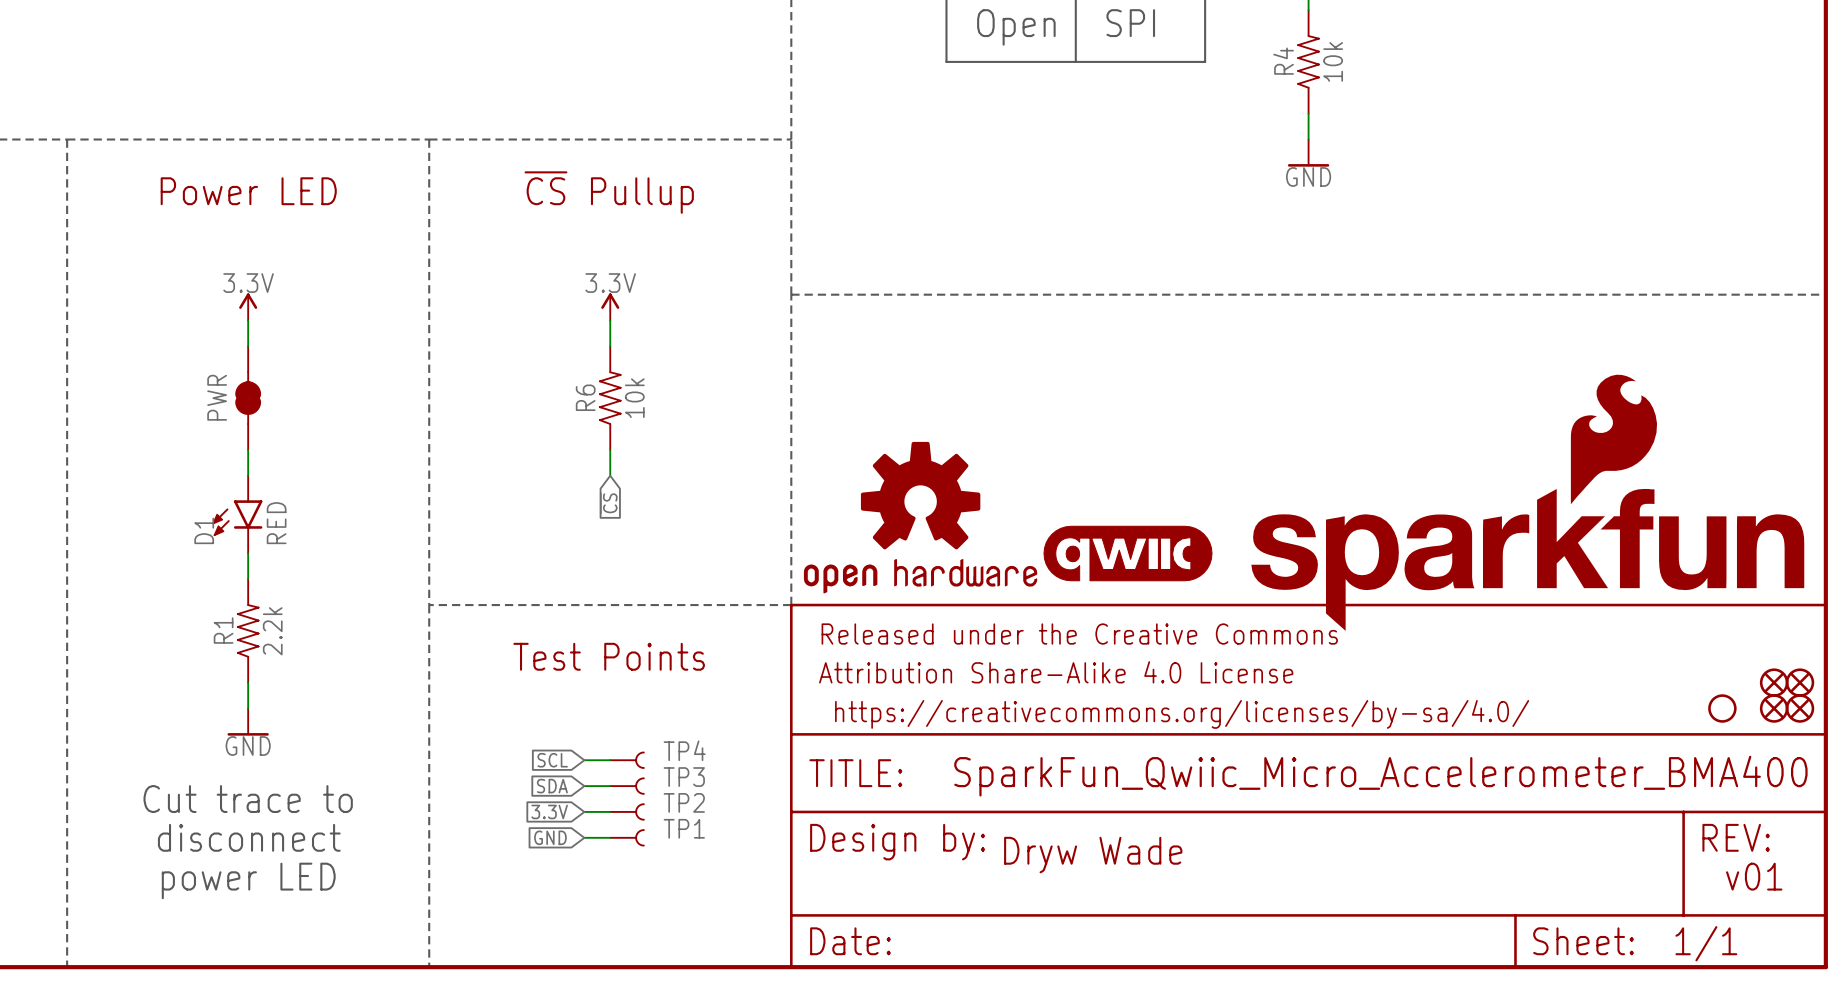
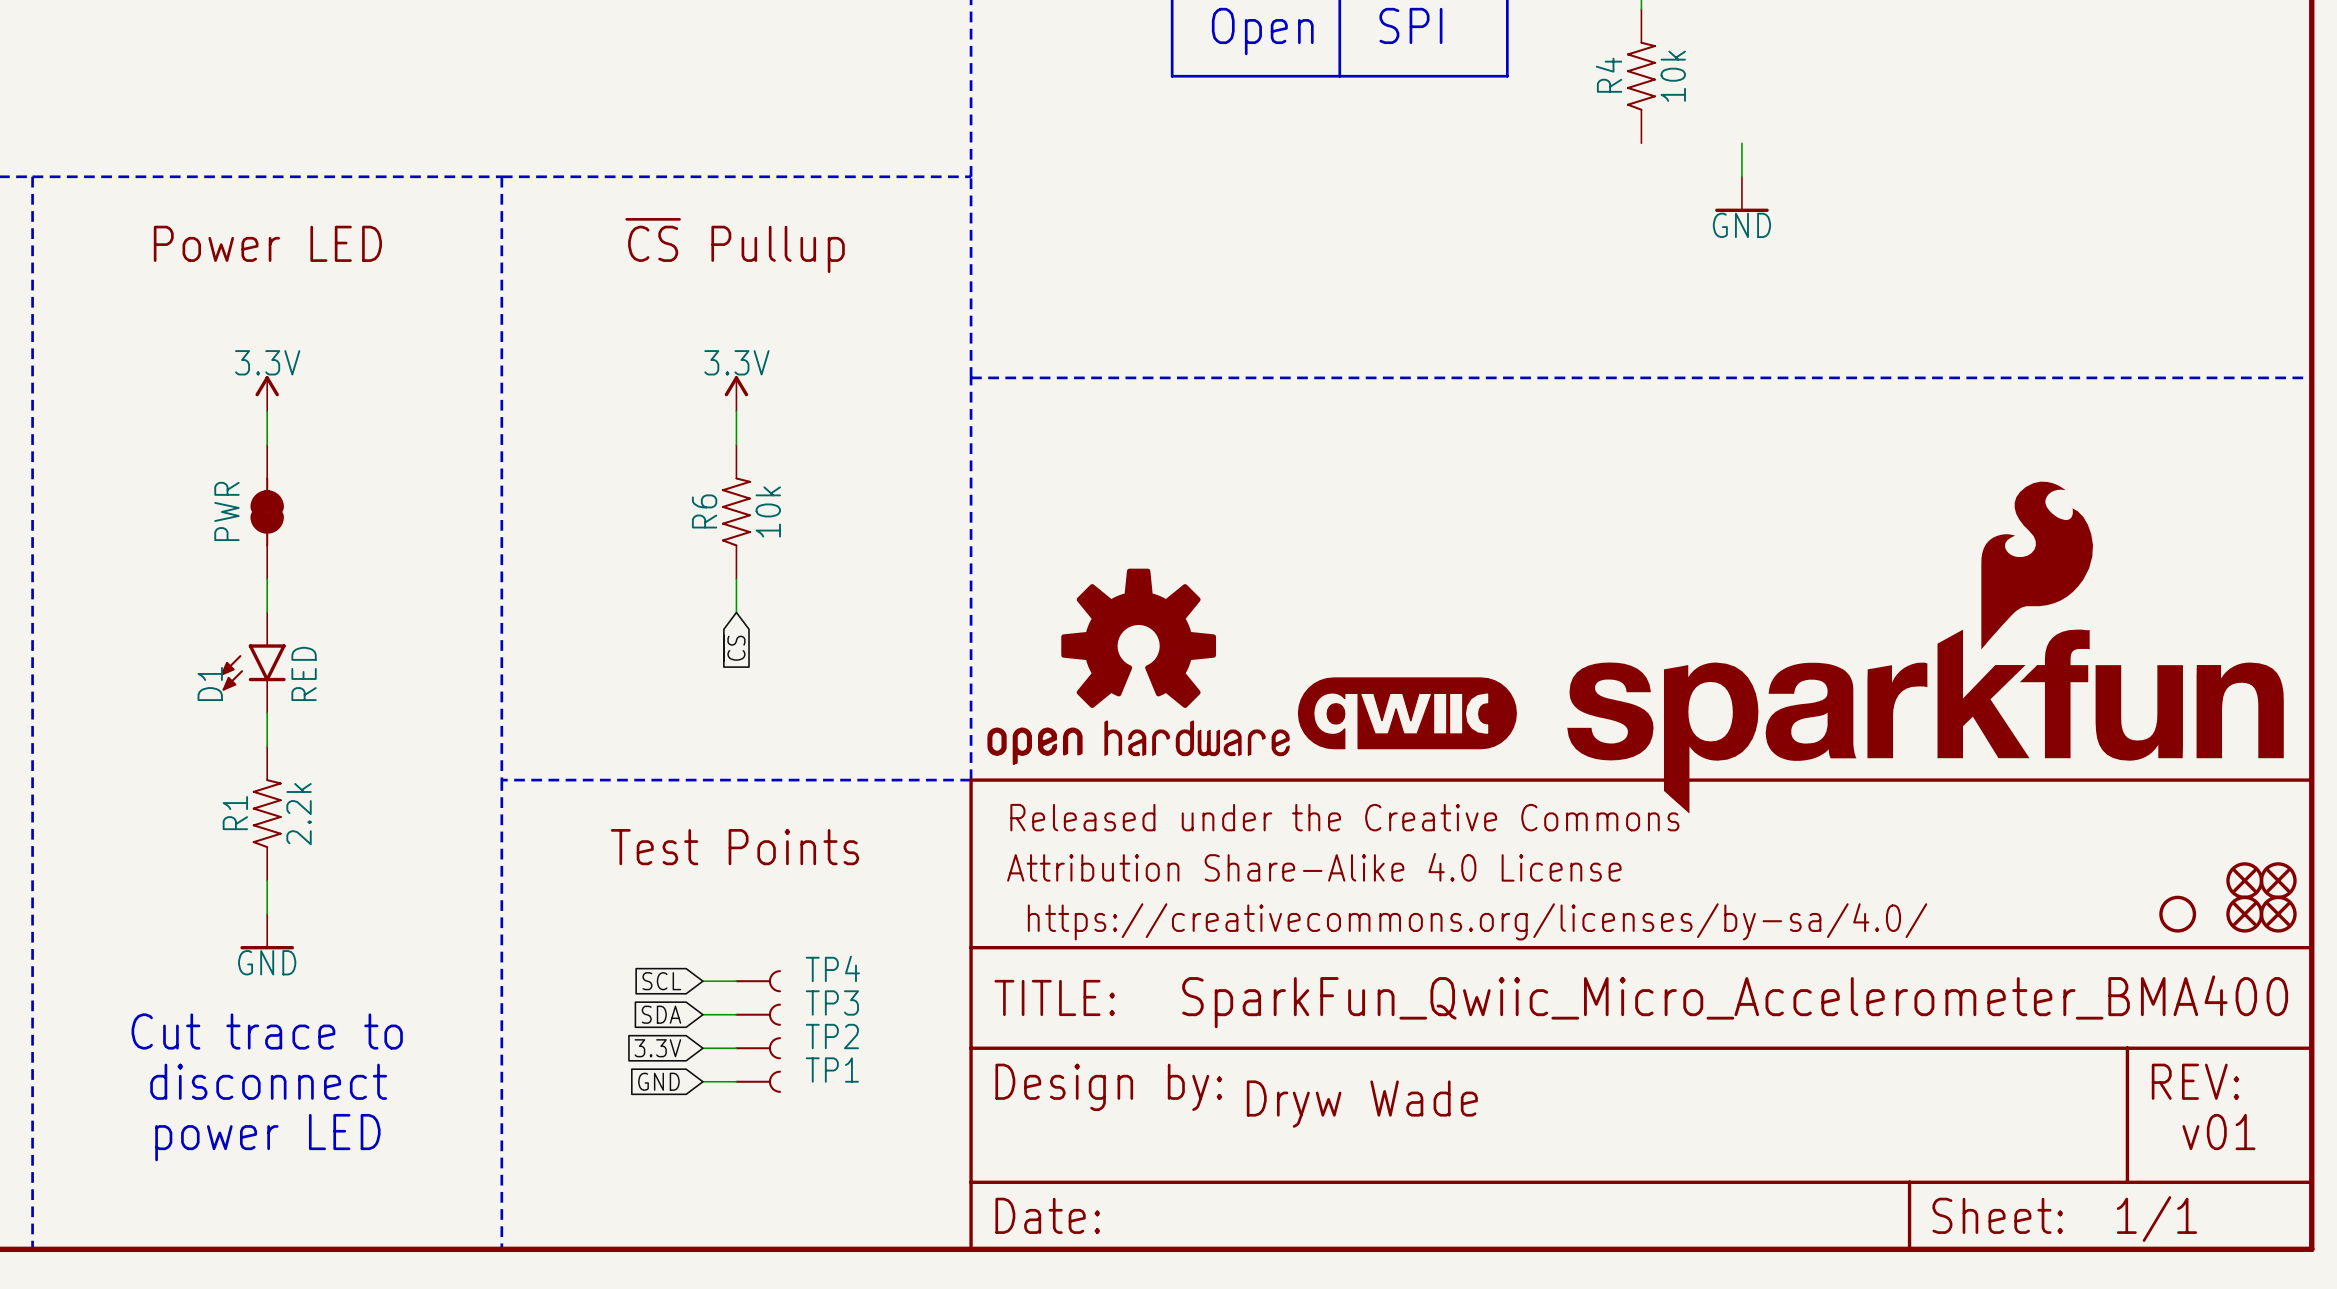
wire: (1308, 113) (1308, 139) -> (1741, 143) (1741, 176)
power symbol position: GND (1308, 153) -> GND (1741, 194)

